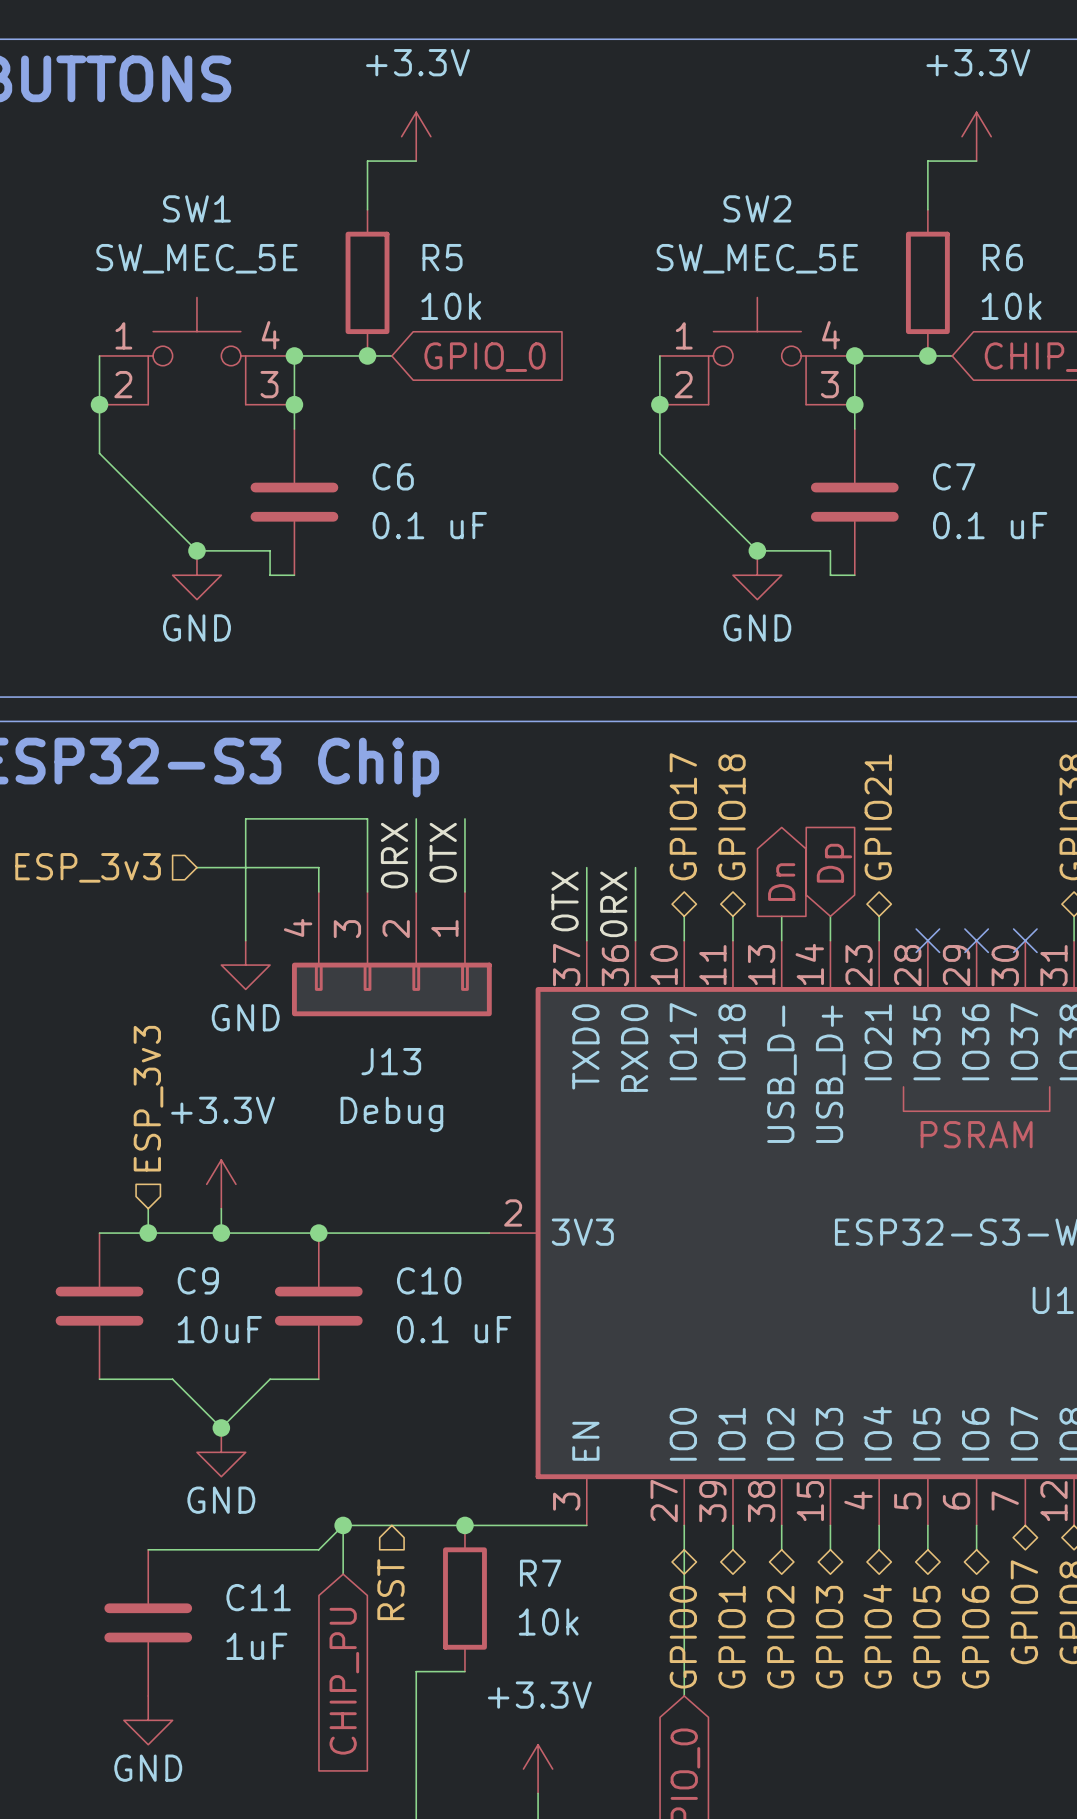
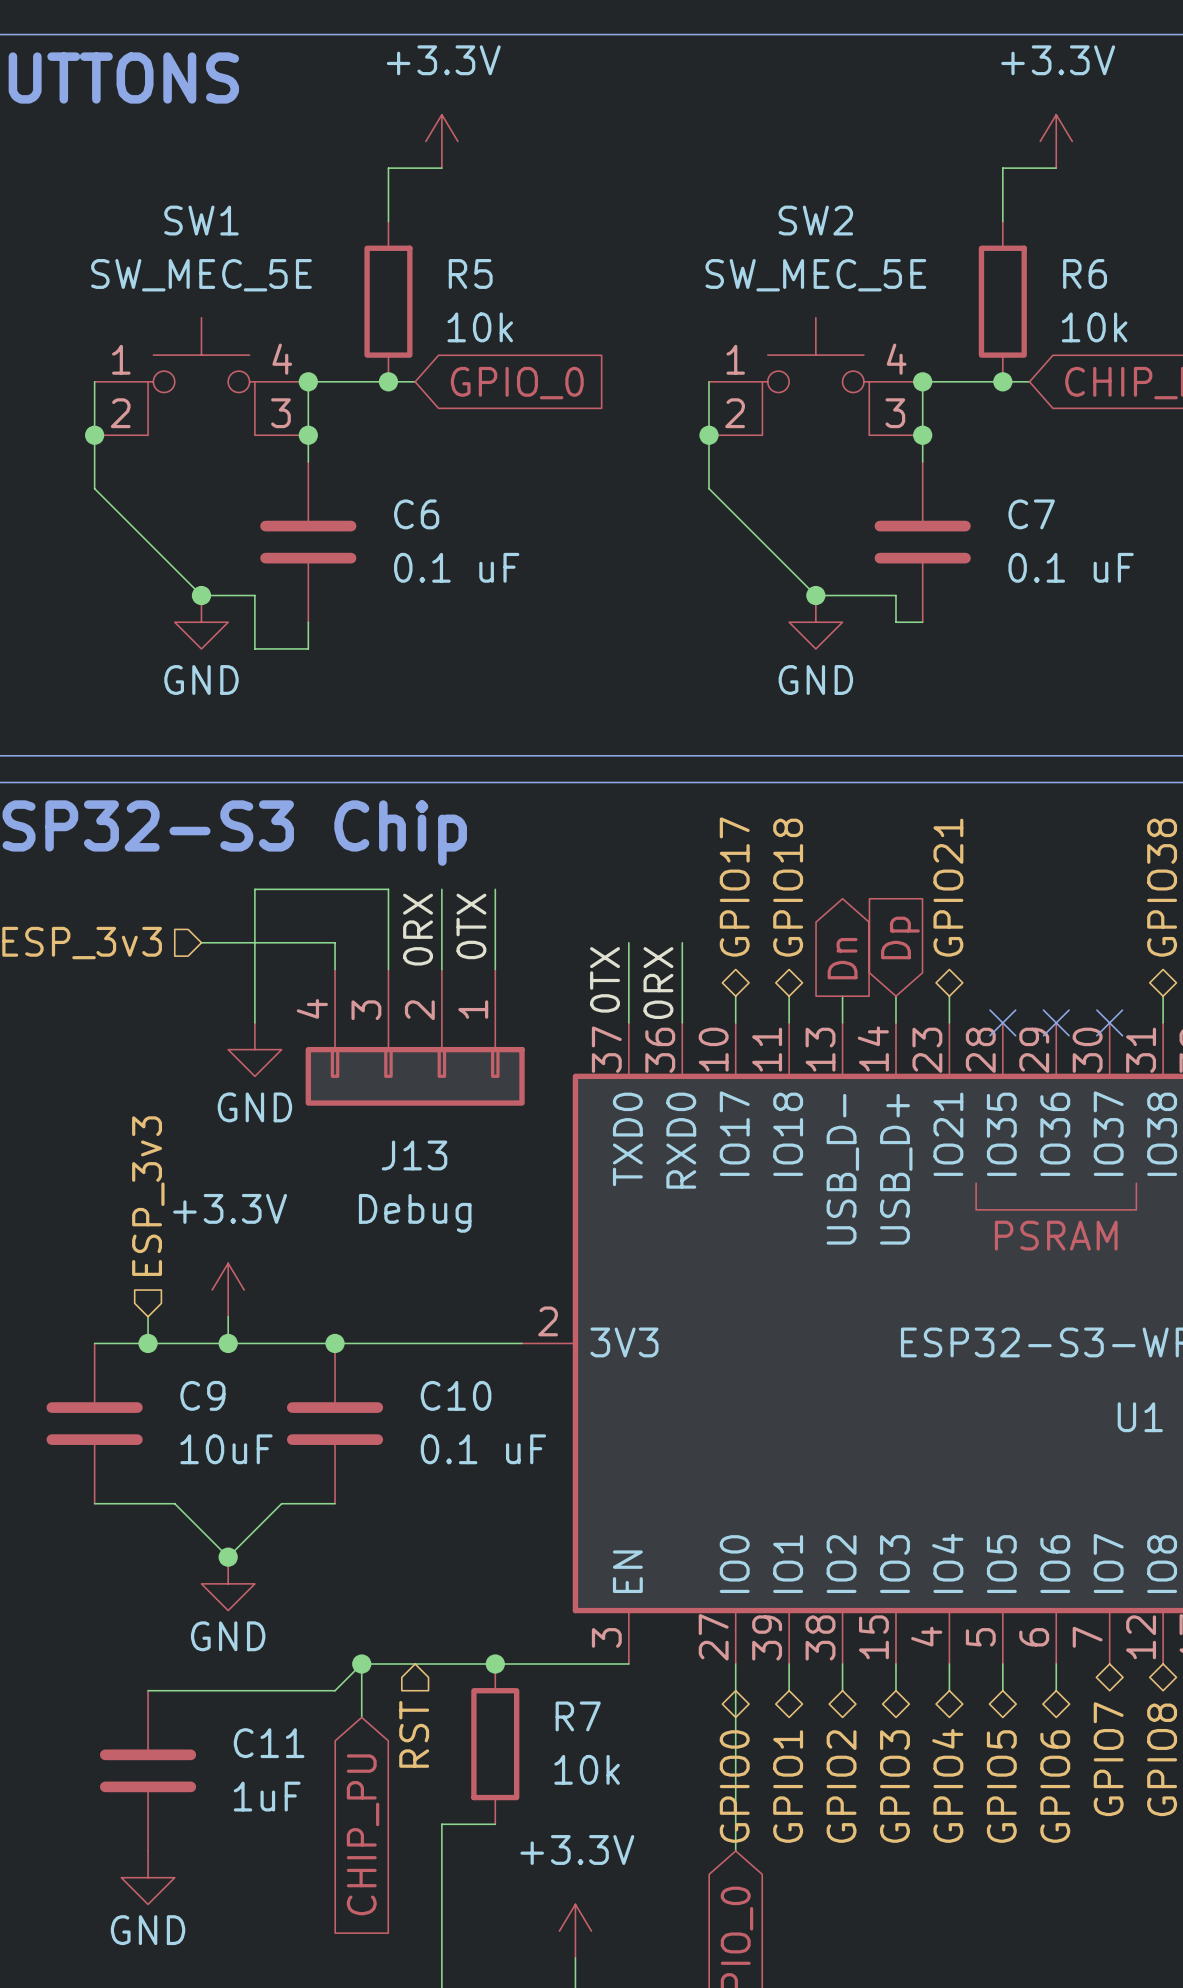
wire: (245, 550) (270, 550) (270, 575) (294, 575) -> (254, 595) (254, 648) (308, 648) (308, 622)

